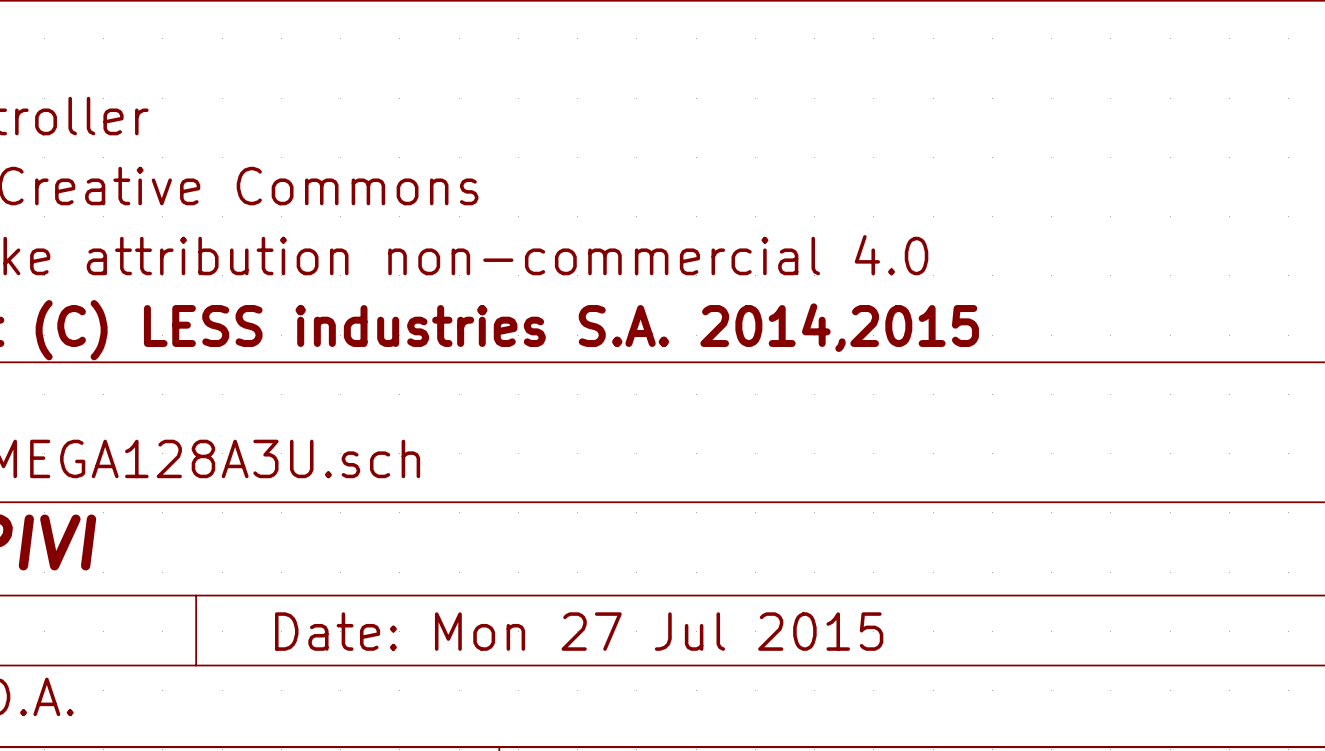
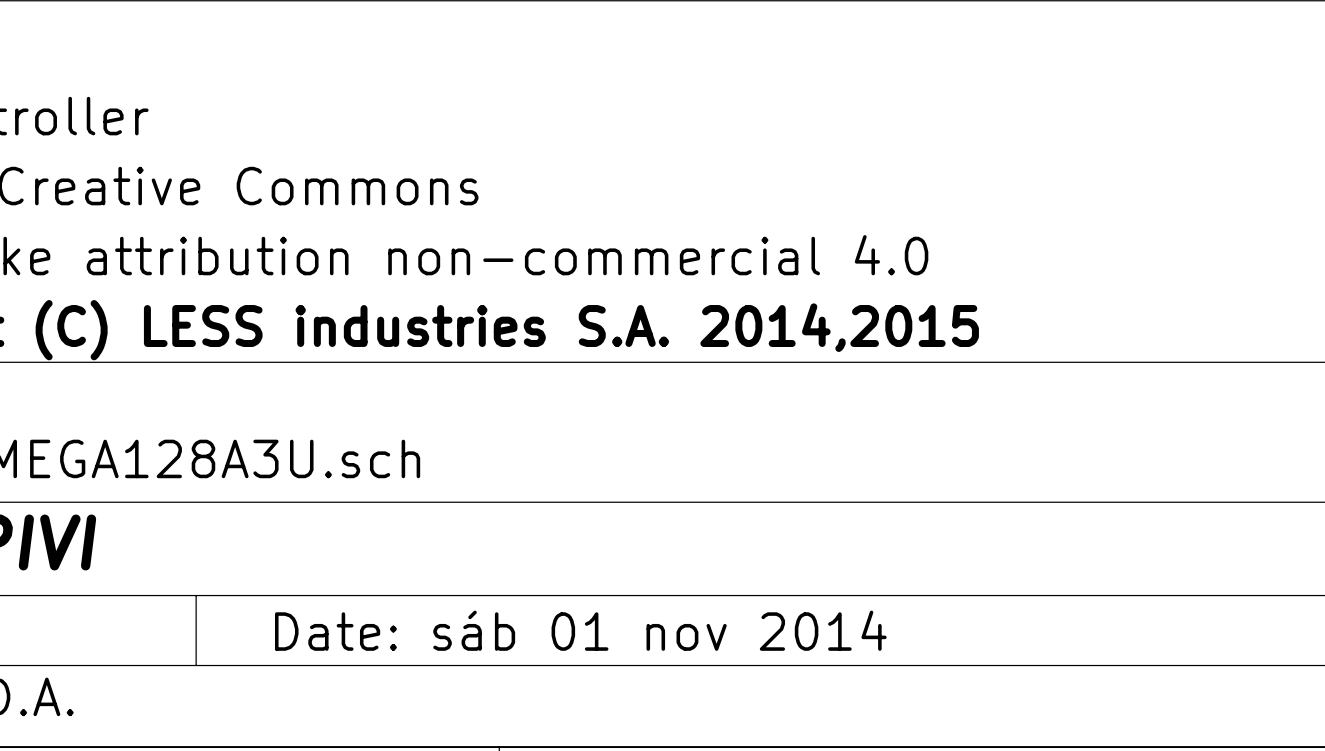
title block: Date: Mon 27 Jul 2015 (579, 631) -> Date: sáb 01 nov 2014 (580, 630)

